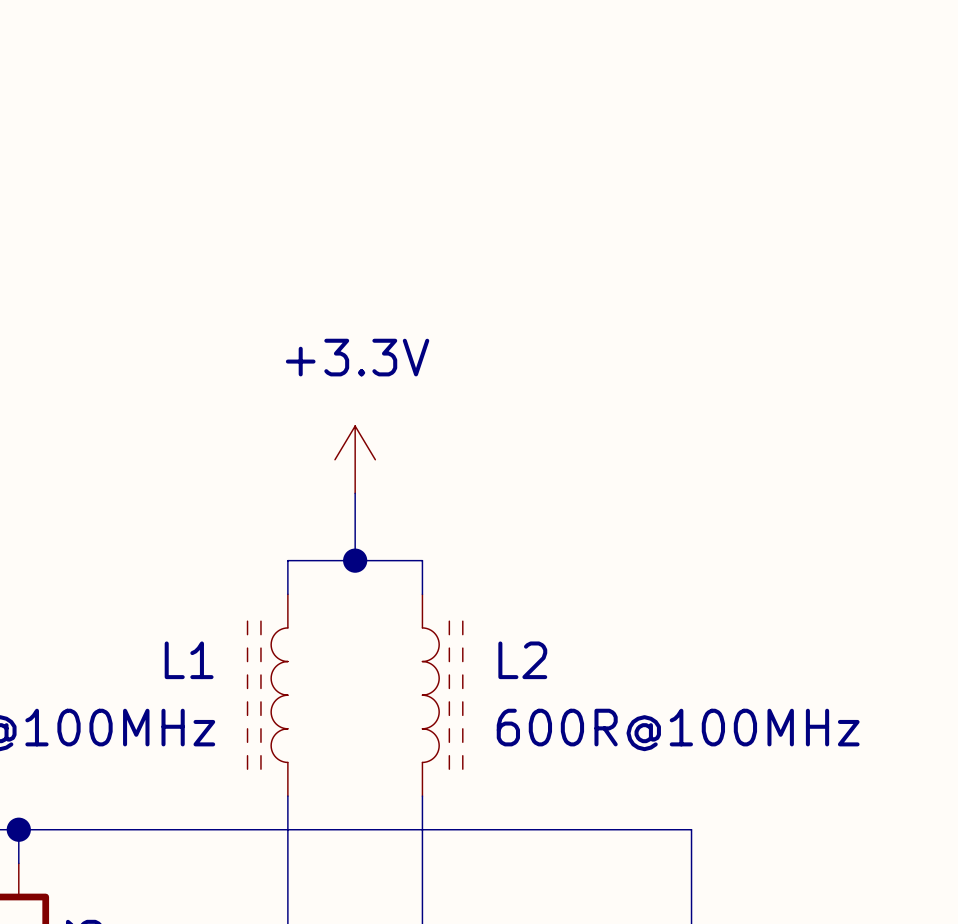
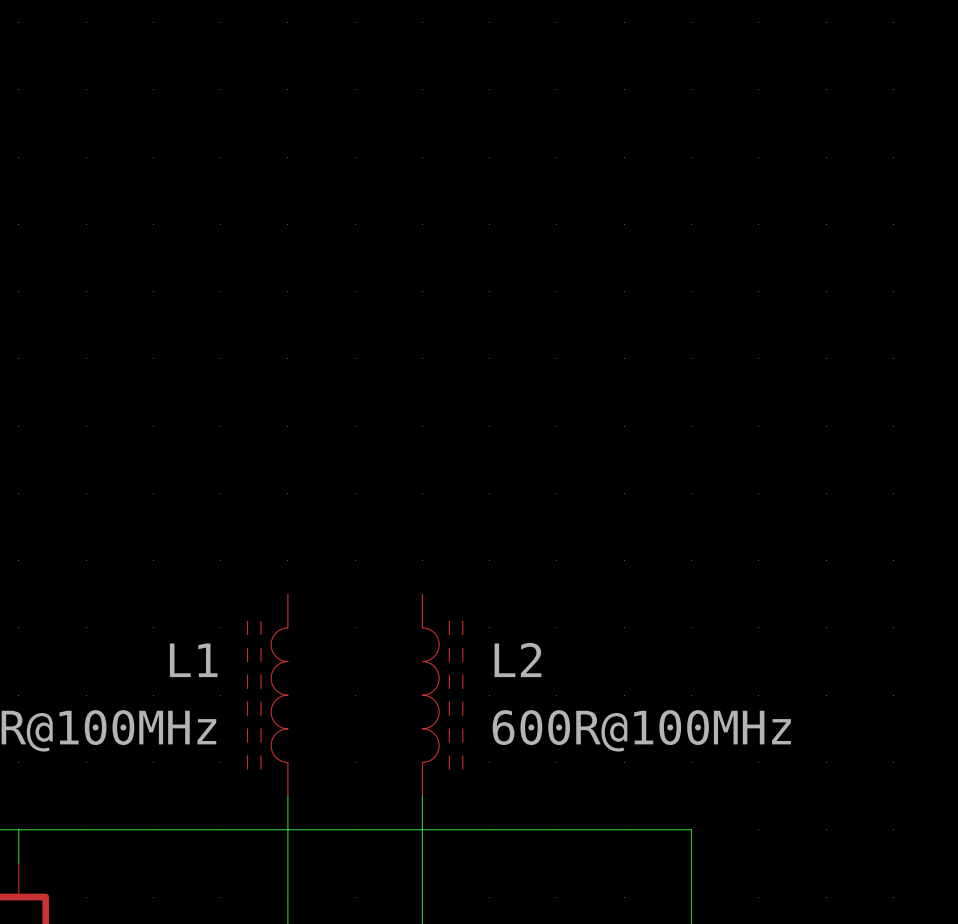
power symbol: +3.3V (355, 459) -> none
wire: (355, 493) (355, 560) -> none
junction: (355, 560) -> none
wire: (287, 594) (287, 560) (422, 560) (422, 594) -> none
junction: (18, 829) -> none

